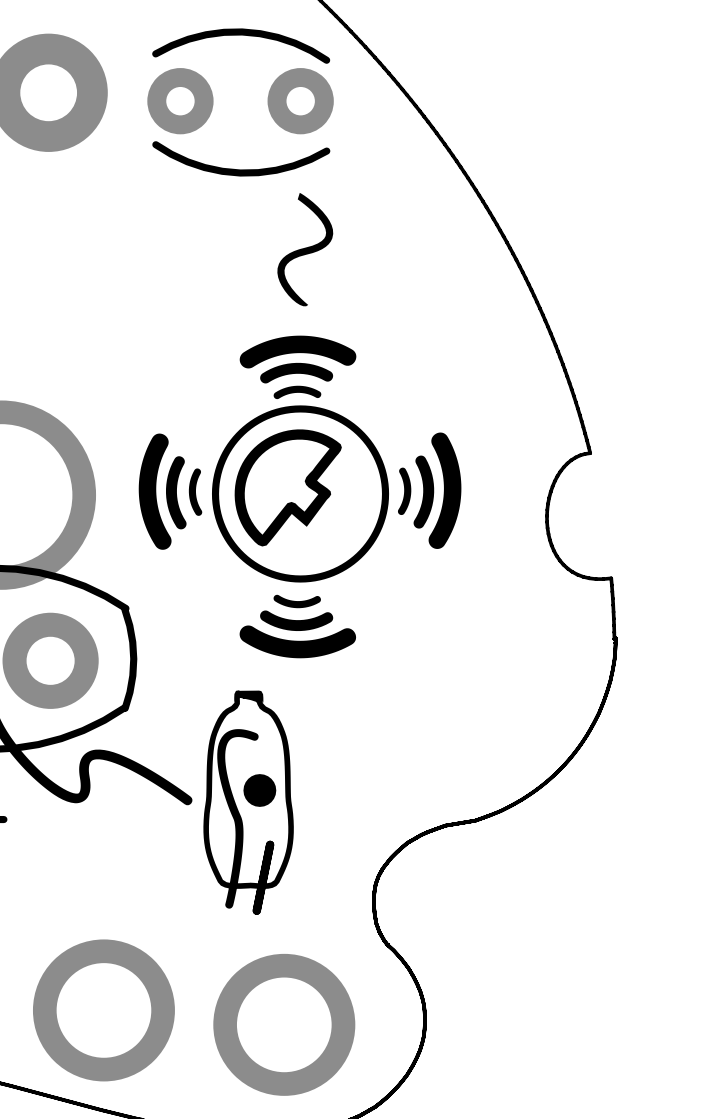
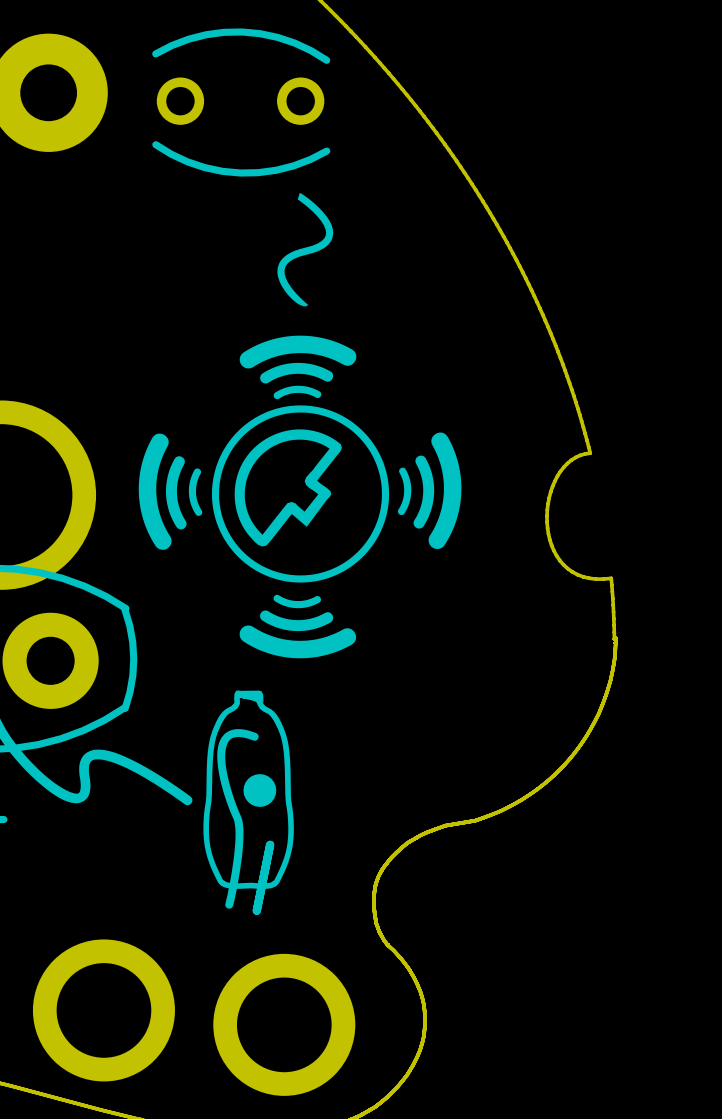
part footprint: [147, 28, 334, 177] -> [152, 28, 331, 177]

